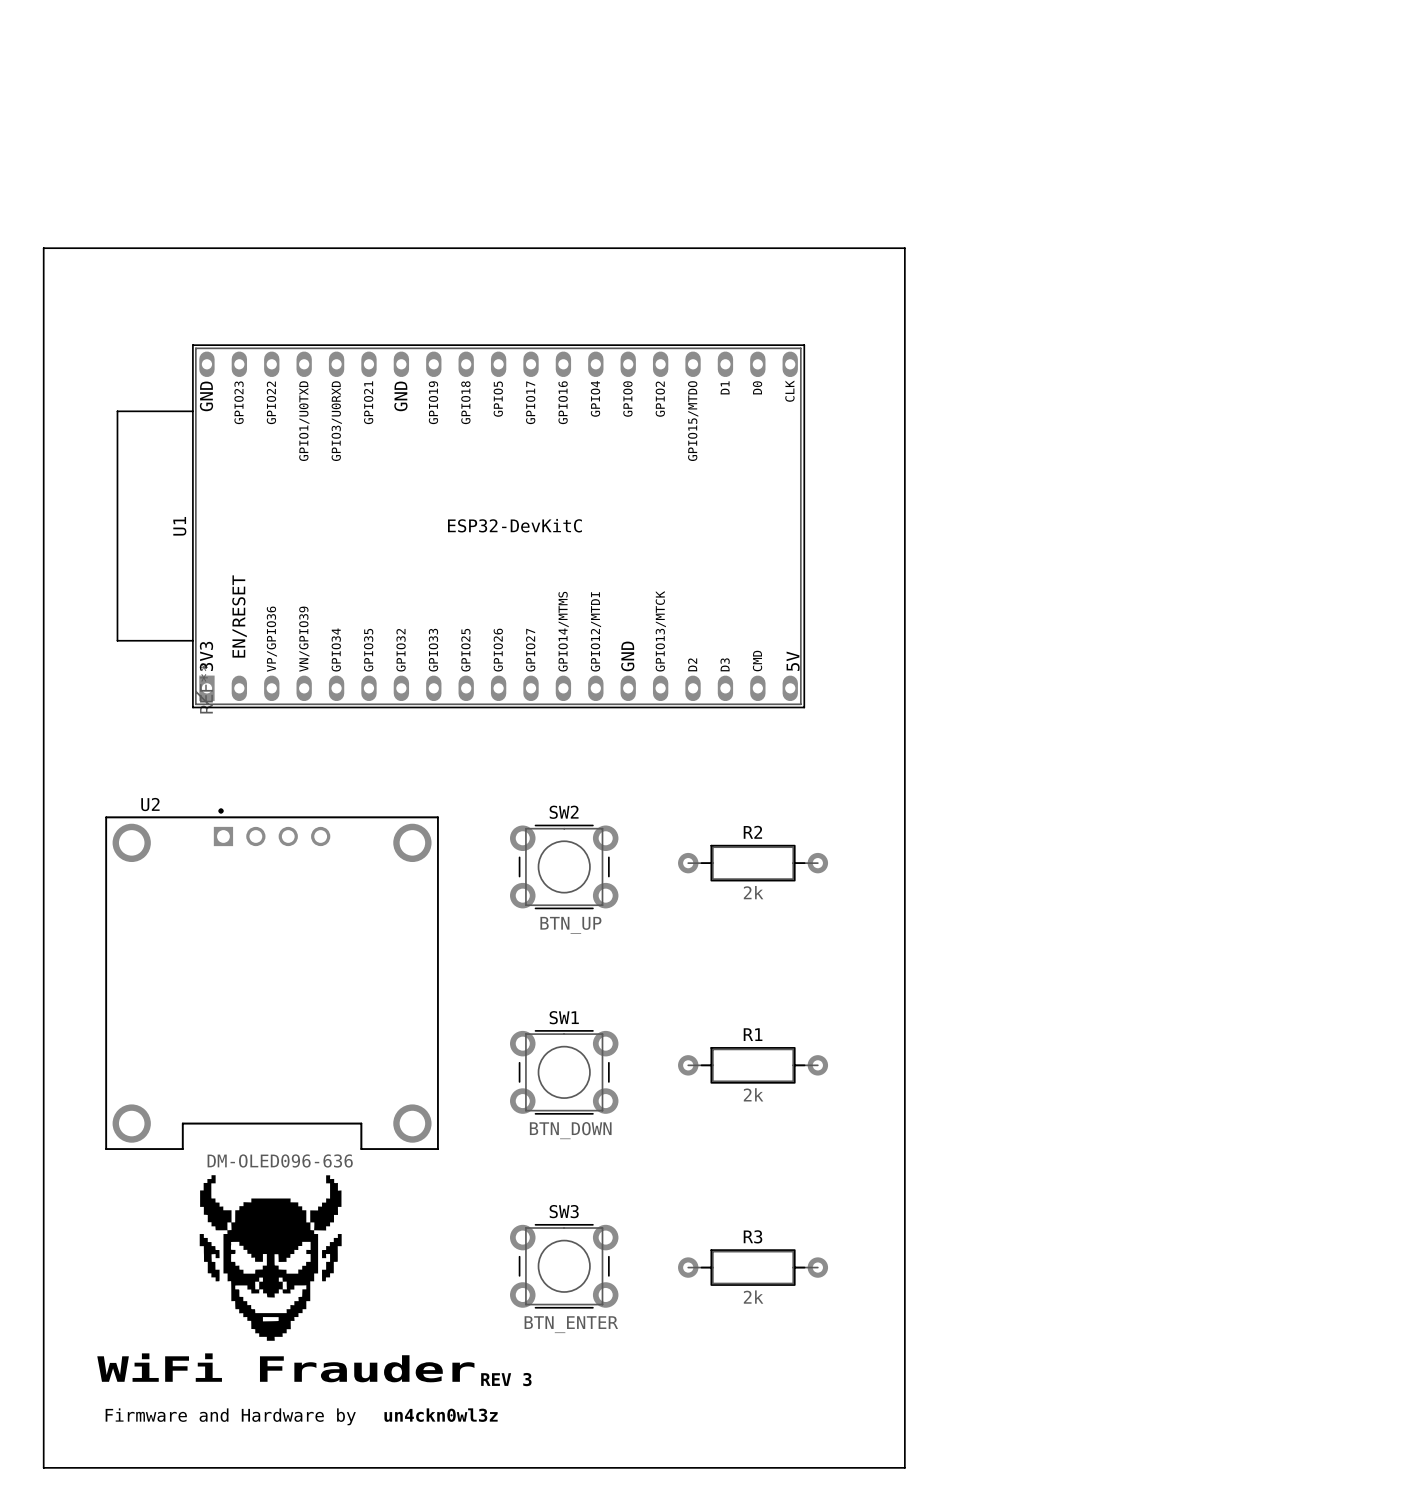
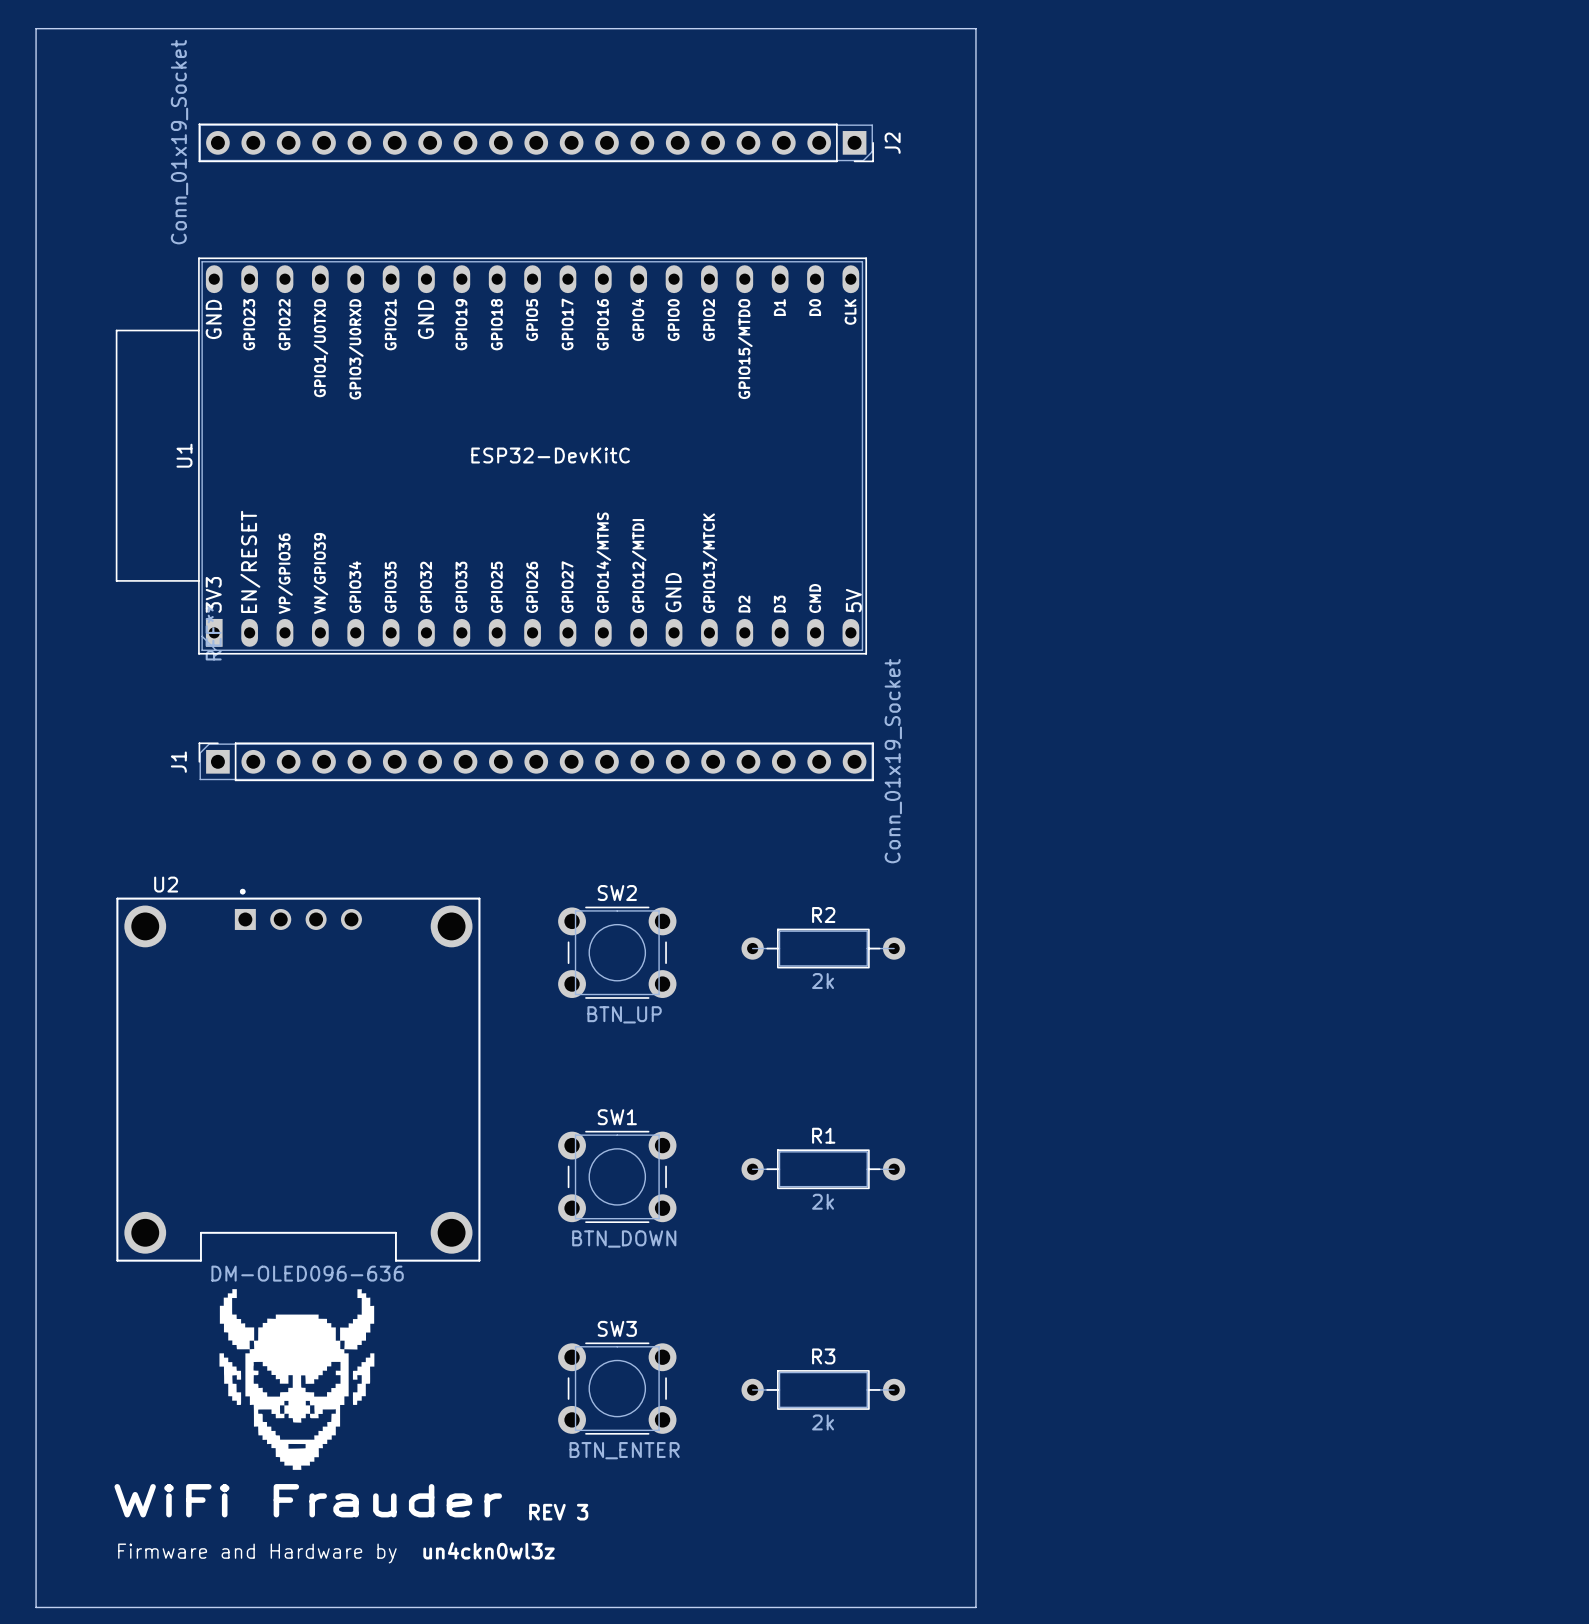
J2: none -> Conn_01x19_Socket (536, 142)
board edge: (43, 248) (904, 248) (904, 1467) (43, 1467) (43, 248) -> (36, 28) (36, 1607) (975, 1607) (975, 28) (36, 28)
U1 position: (460, 526) -> (491, 456)
J1: none -> Conn_01x19_Socket (536, 761)

